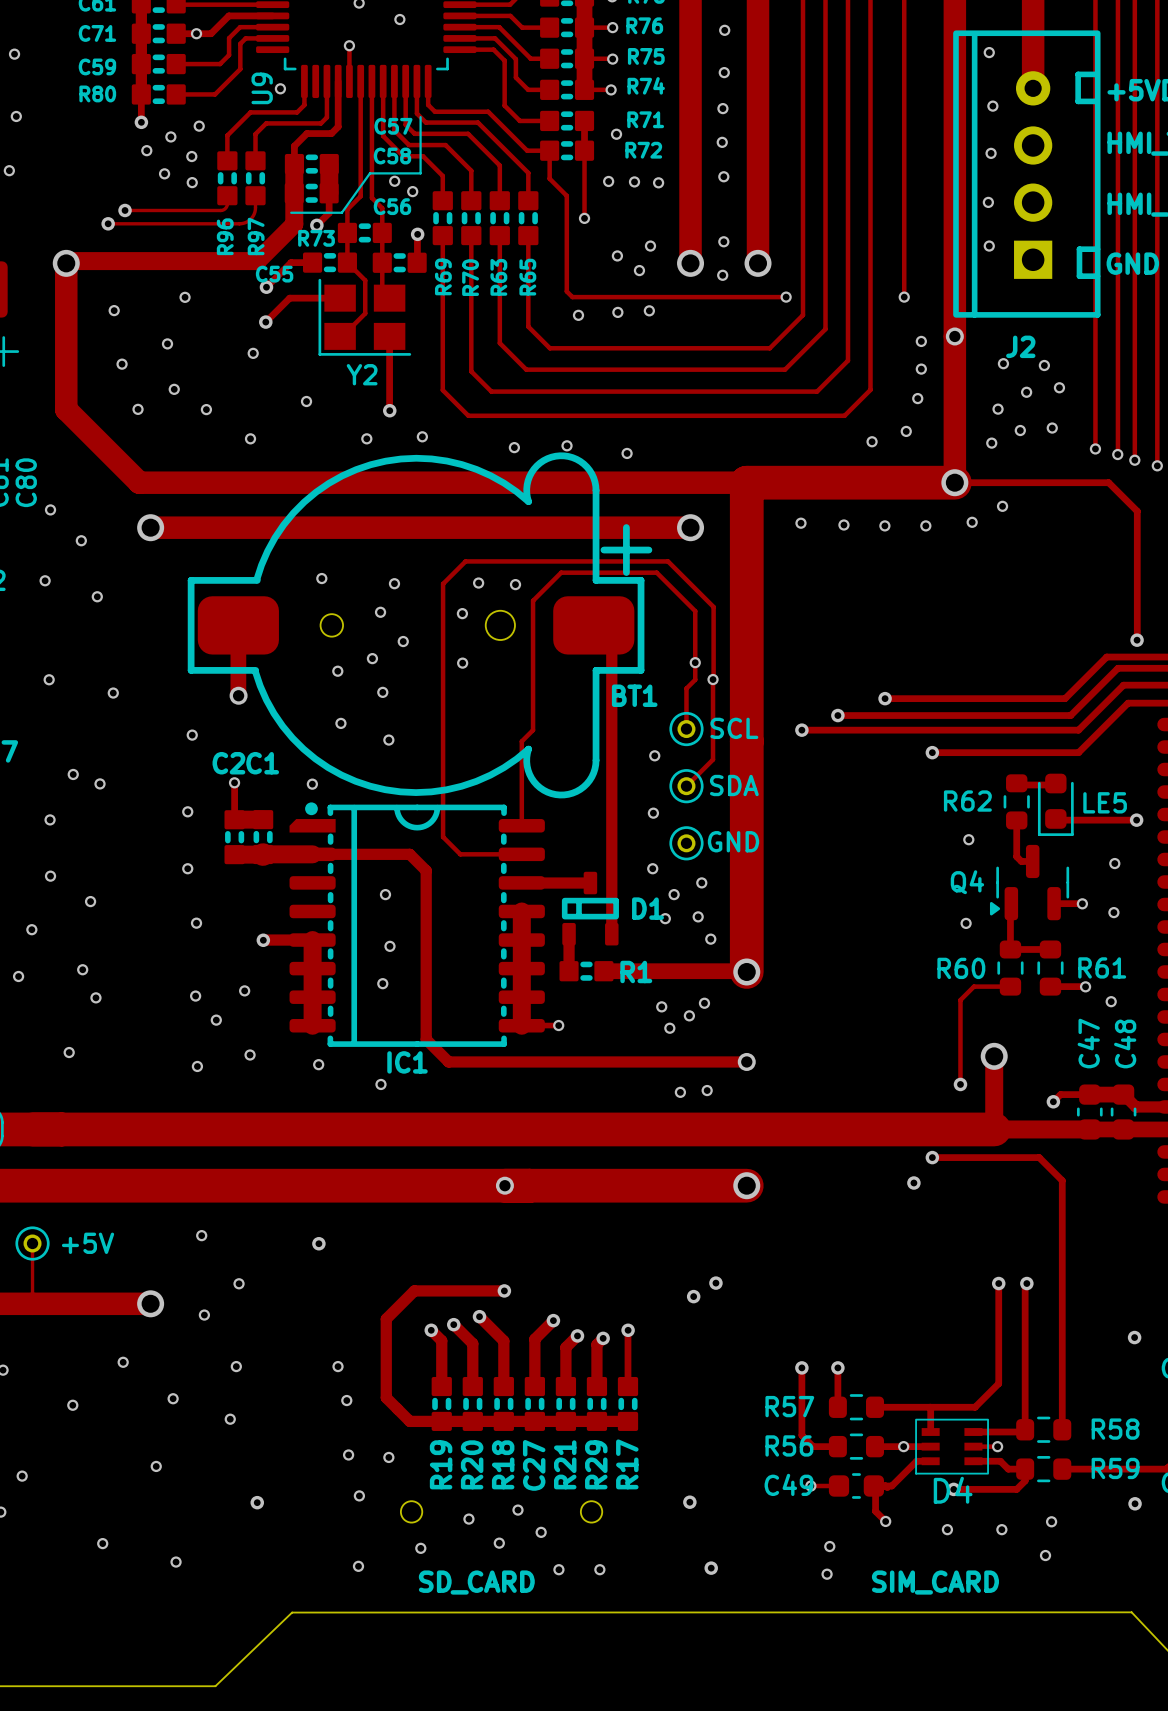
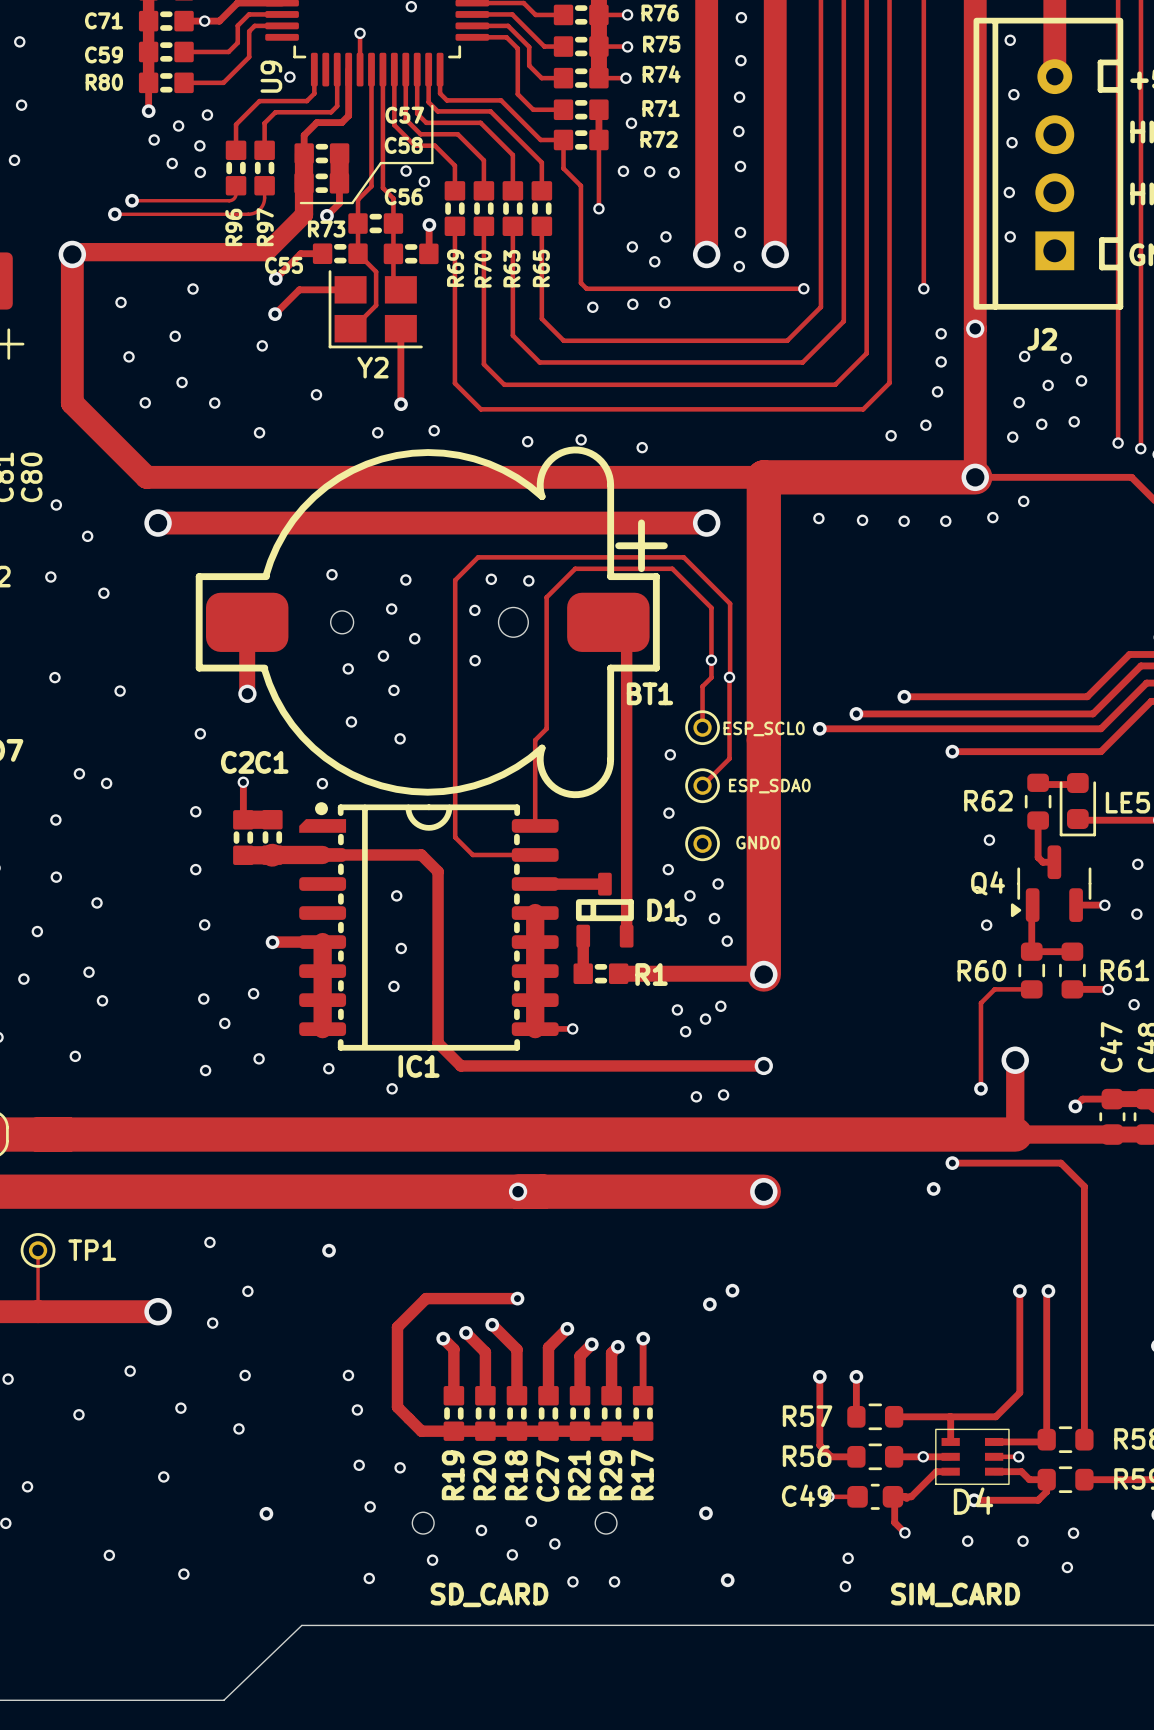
SCL name: SCL (734, 728) -> ESP_SCL0 (764, 728)
SDA name: SDA (734, 785) -> ESP_SDA0 (769, 786)
GND name: GND (733, 841) -> GND0 (758, 842)
+5V name: +5V (88, 1243) -> TP1 (92, 1250)

